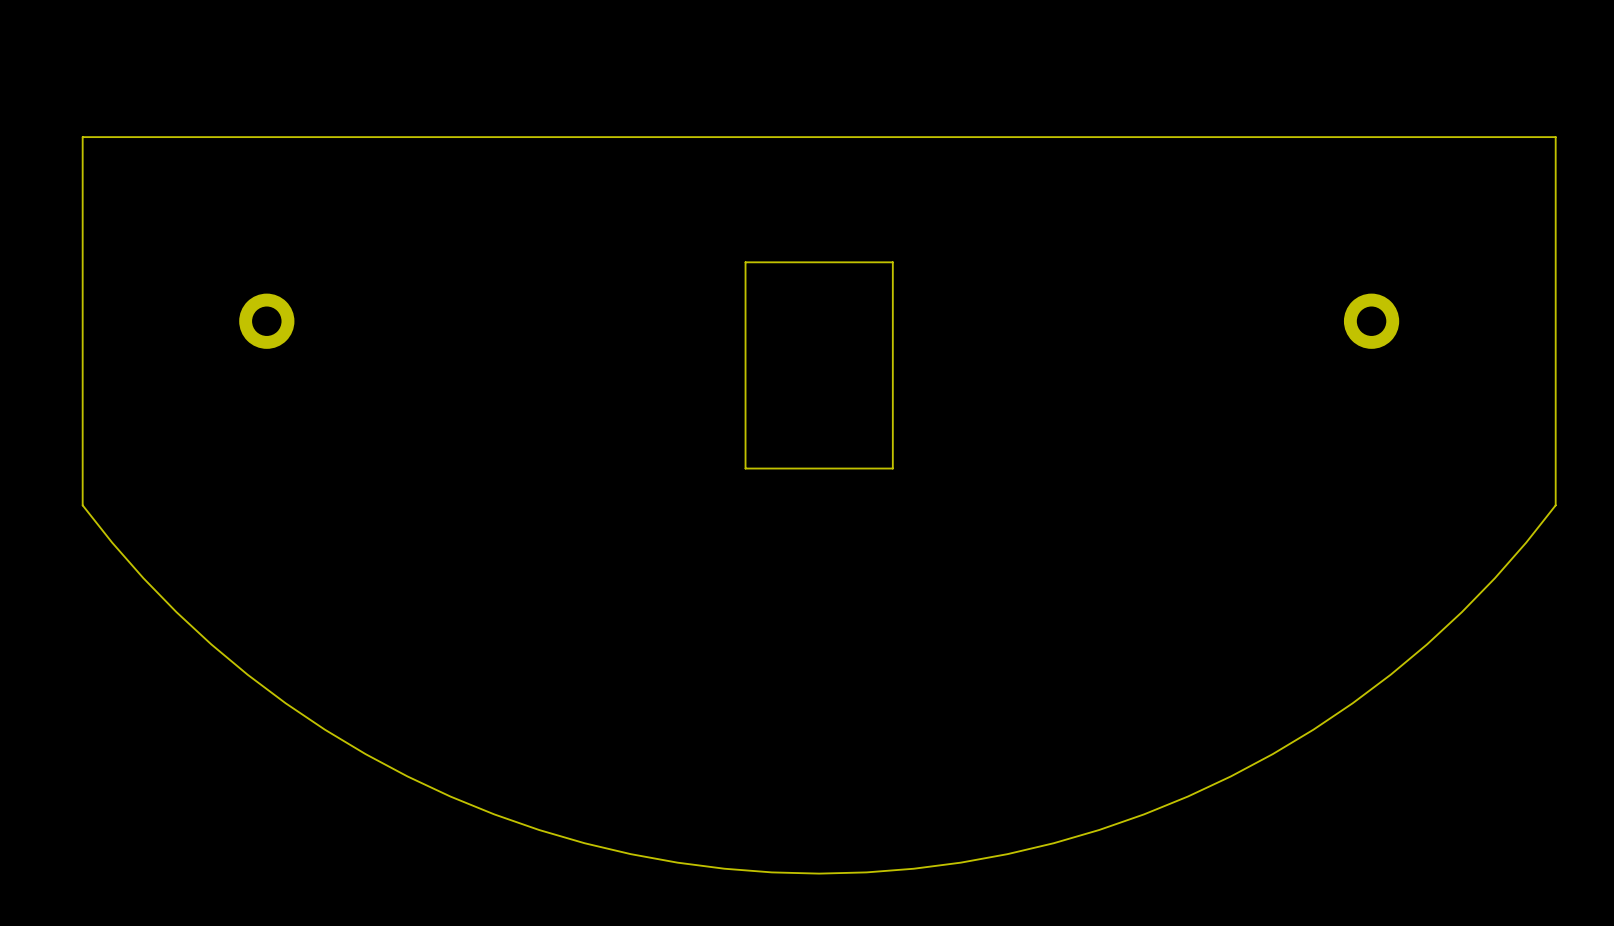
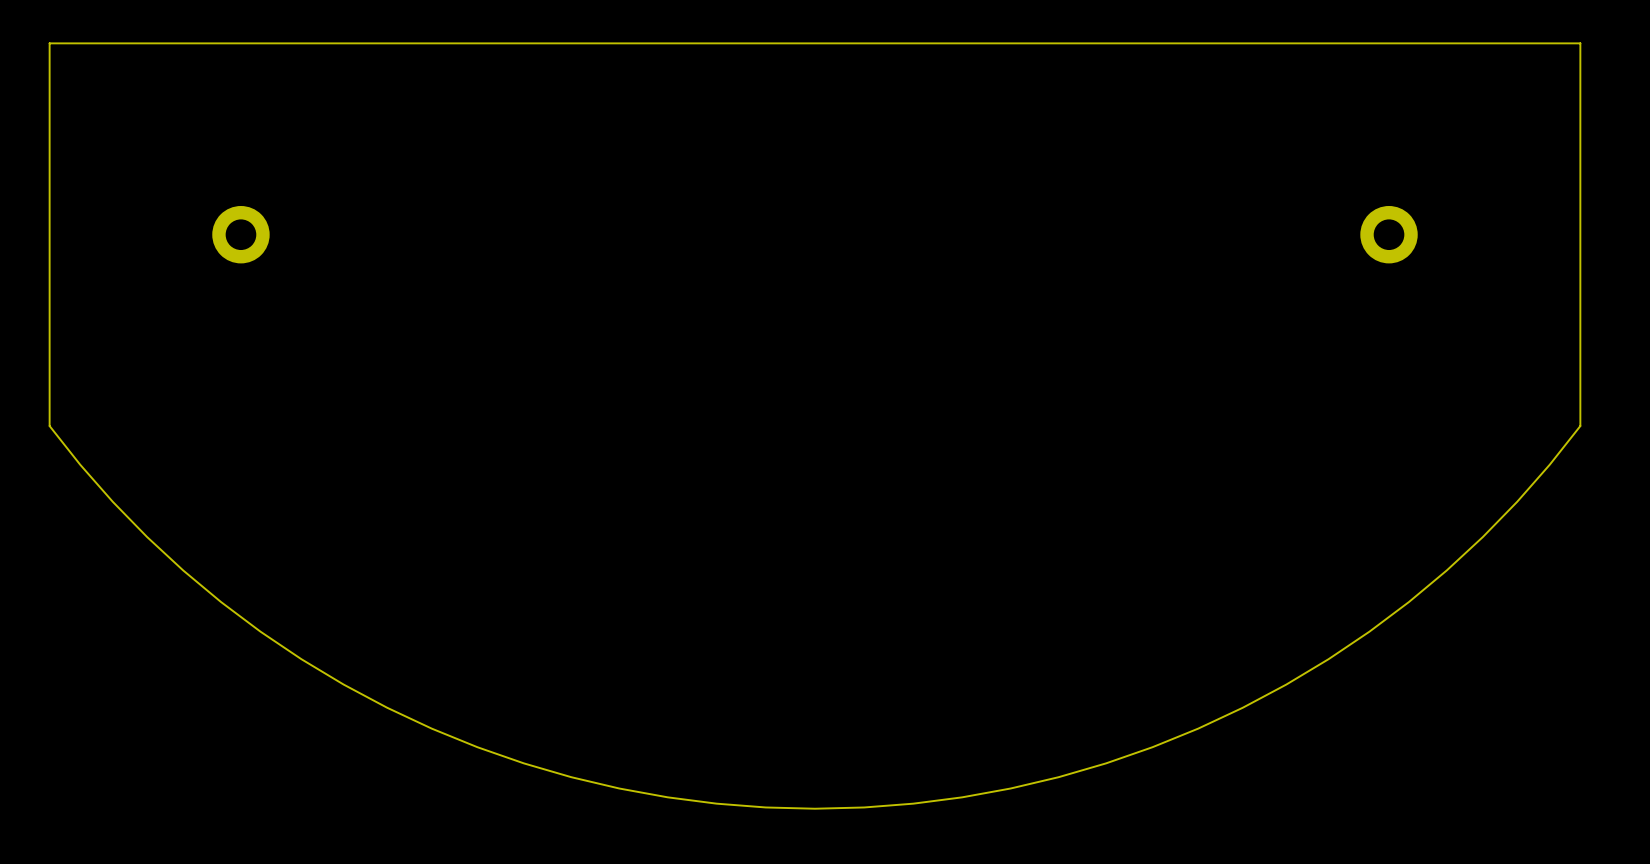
board edge: (745, 262) (892, 262) (892, 468) (745, 468) (745, 262) -> none

